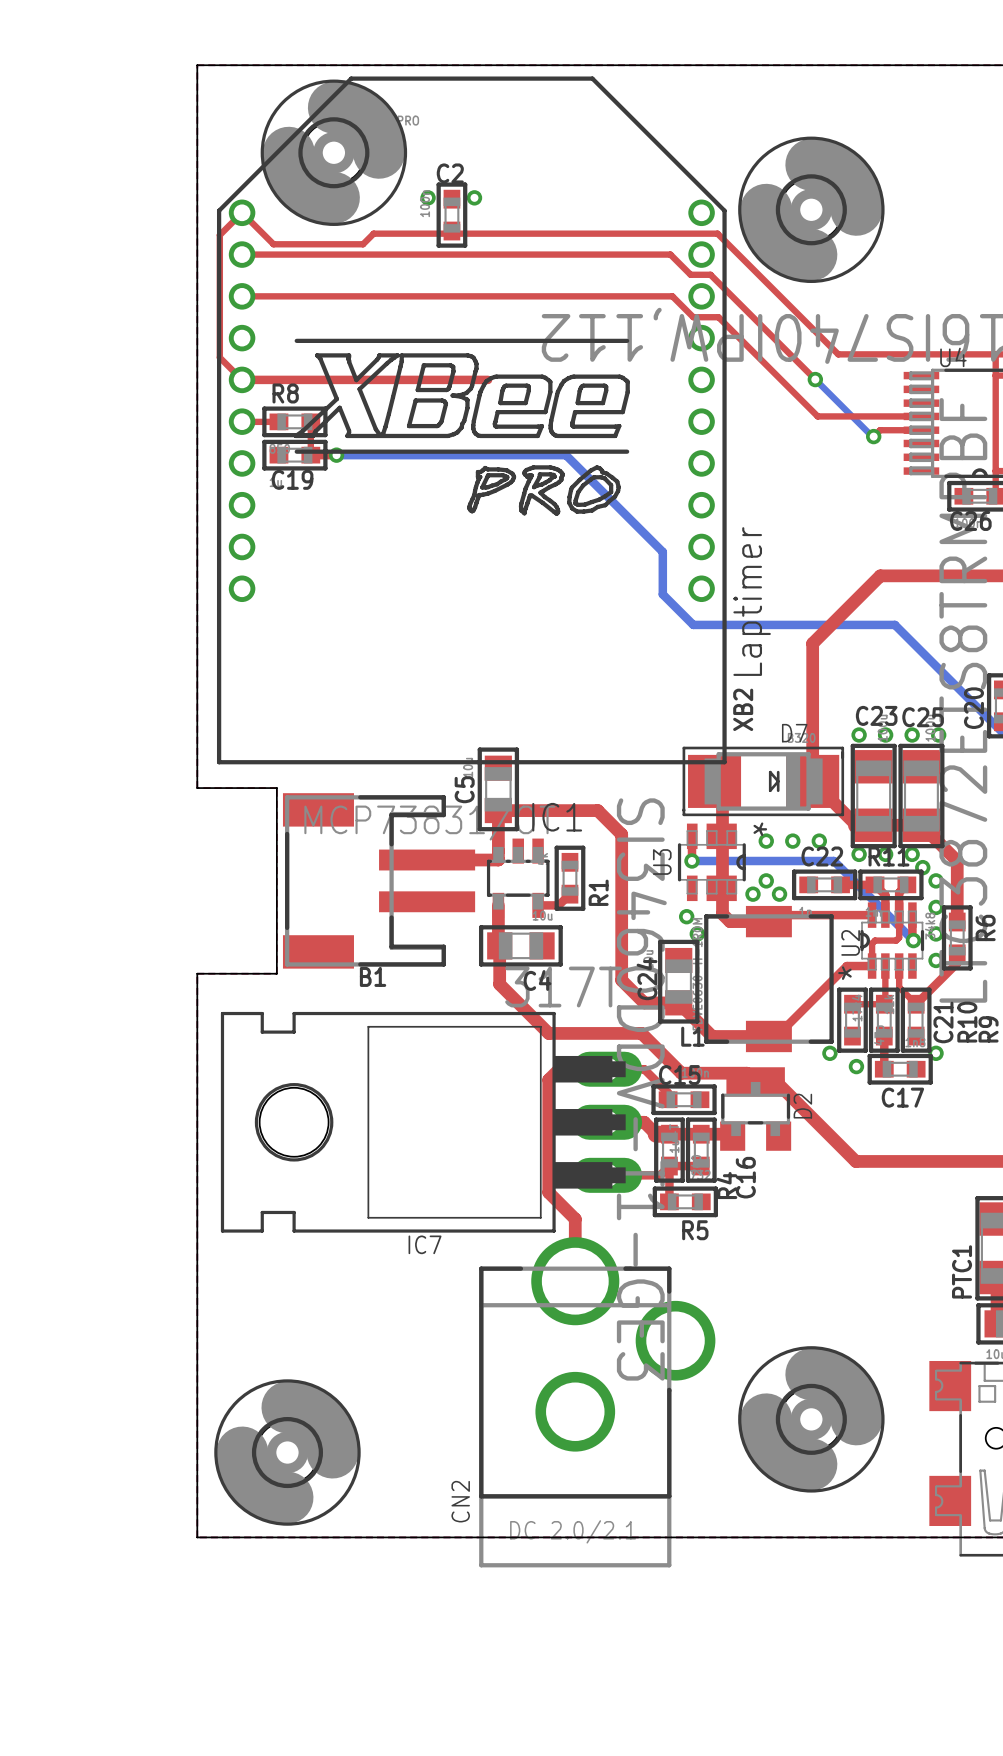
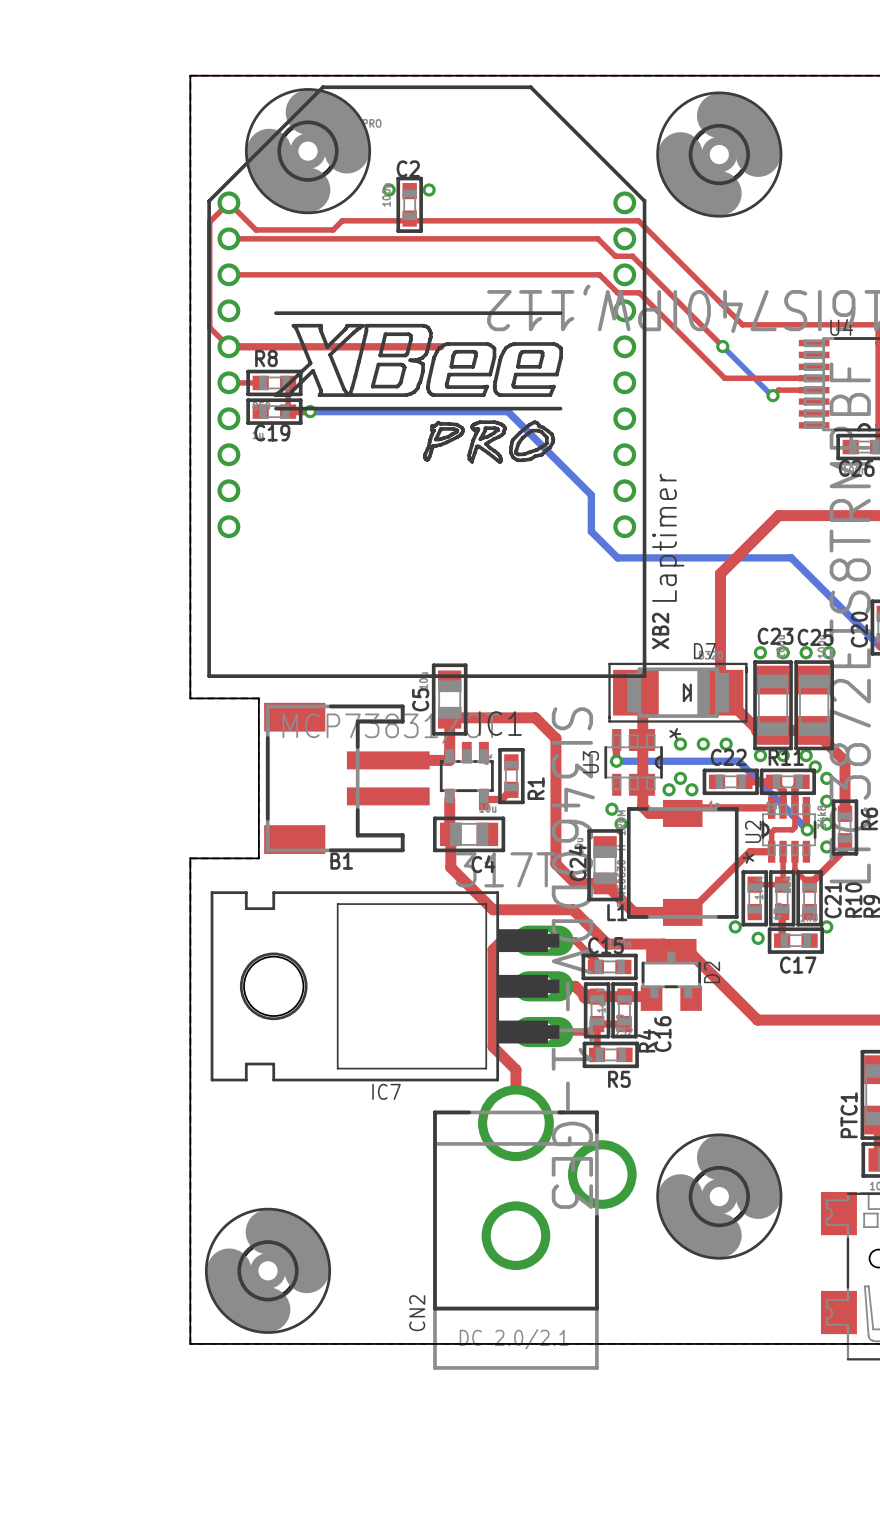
part position: (811, 209) -> (719, 154)
part position: (811, 1419) -> (719, 1196)

